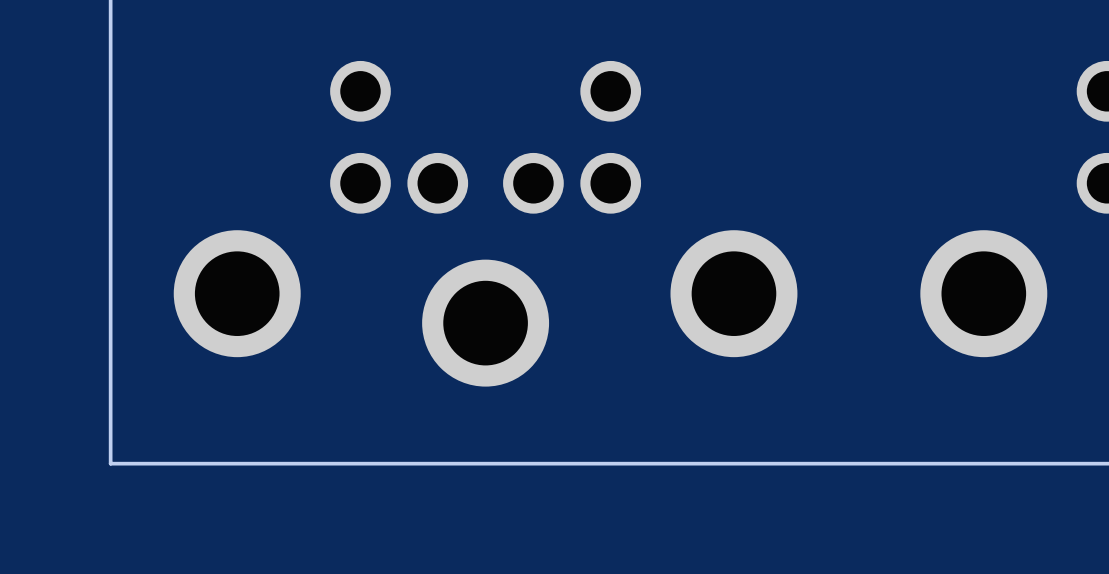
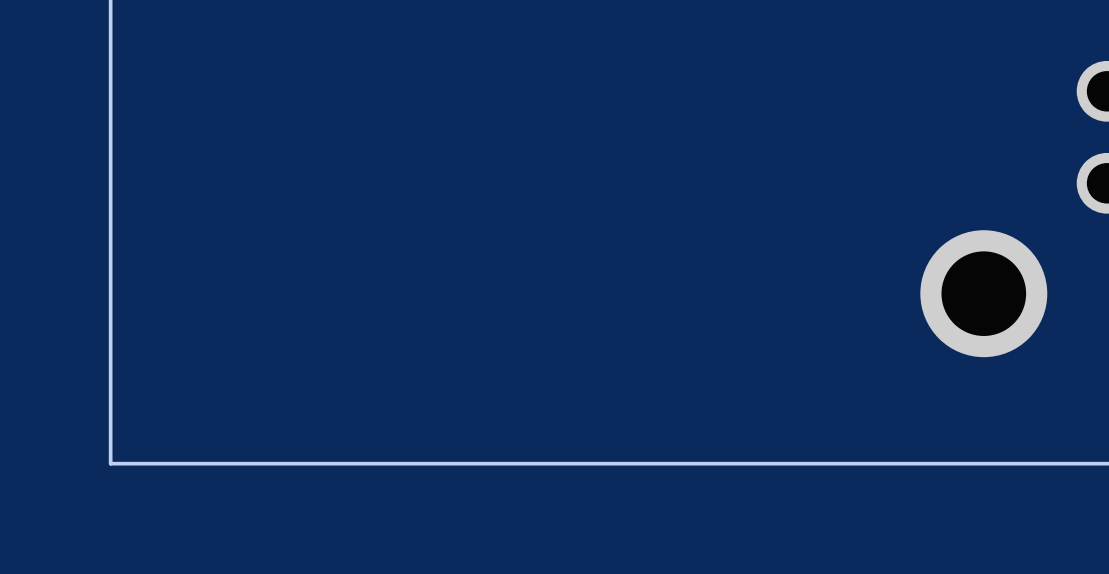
part: (485, 223) -> none

